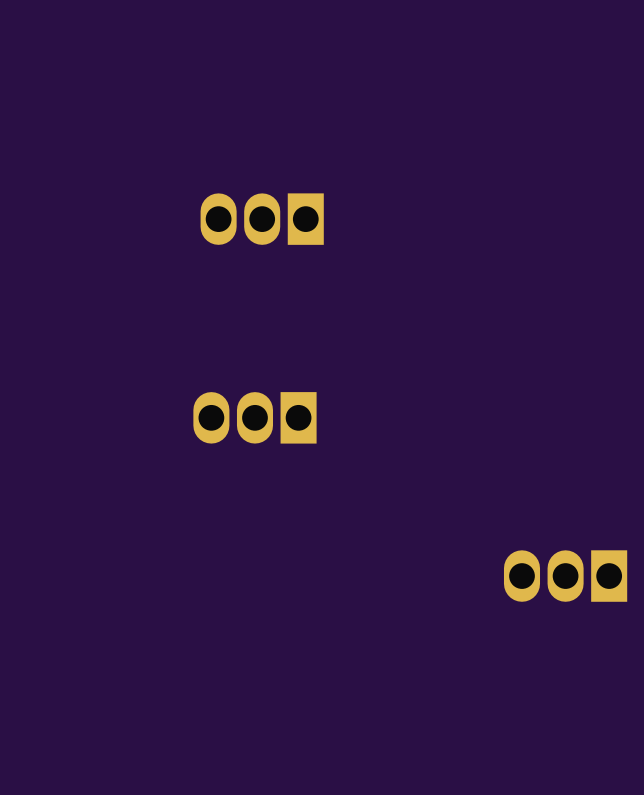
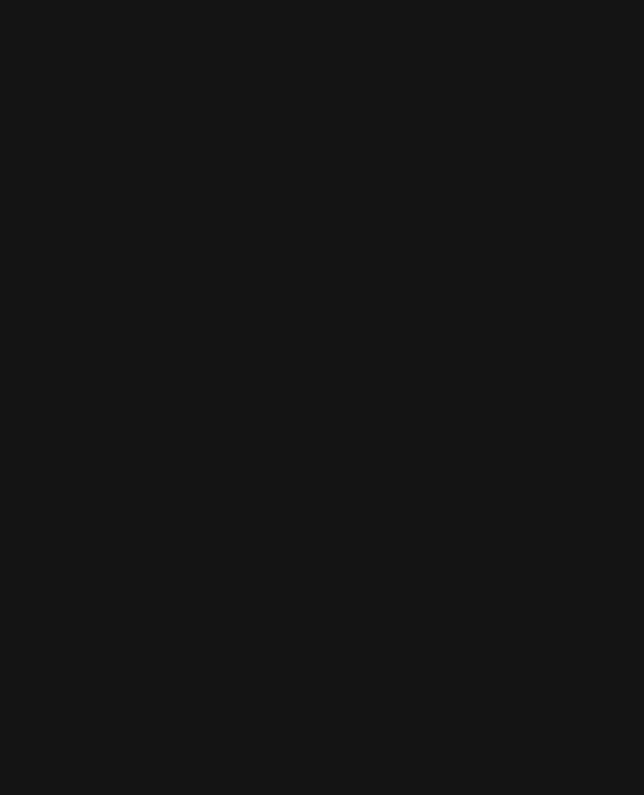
part: (262, 219) -> none
part: (254, 417) -> none
part: (565, 576) -> none

